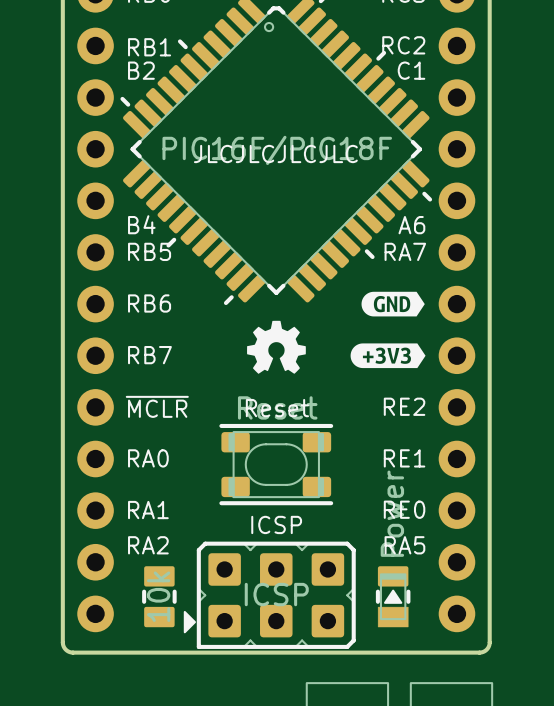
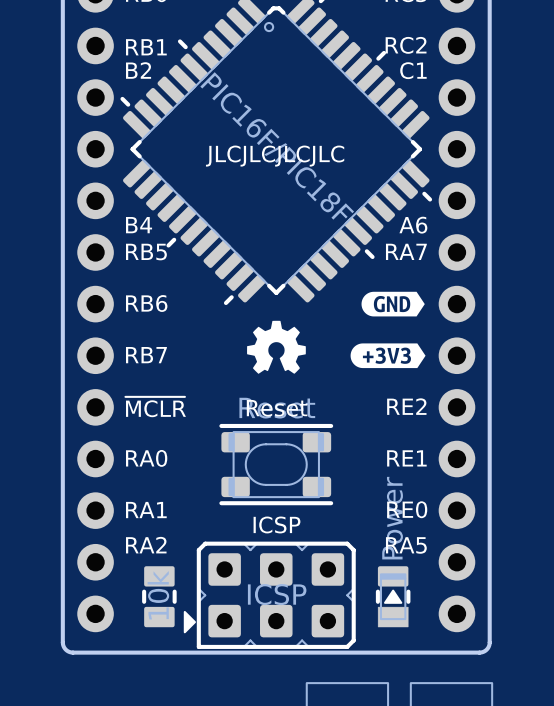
part value rotation: 0° (277, 150) -> 45° clockwise (277, 145)

